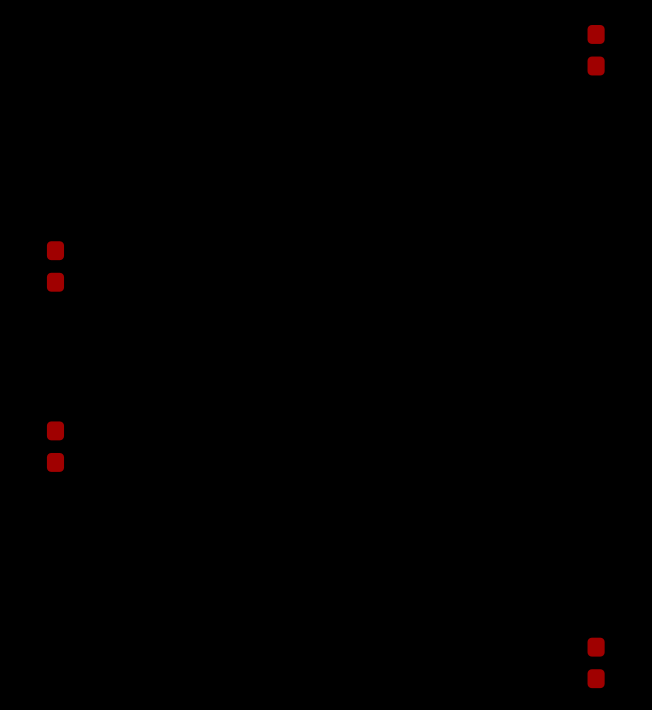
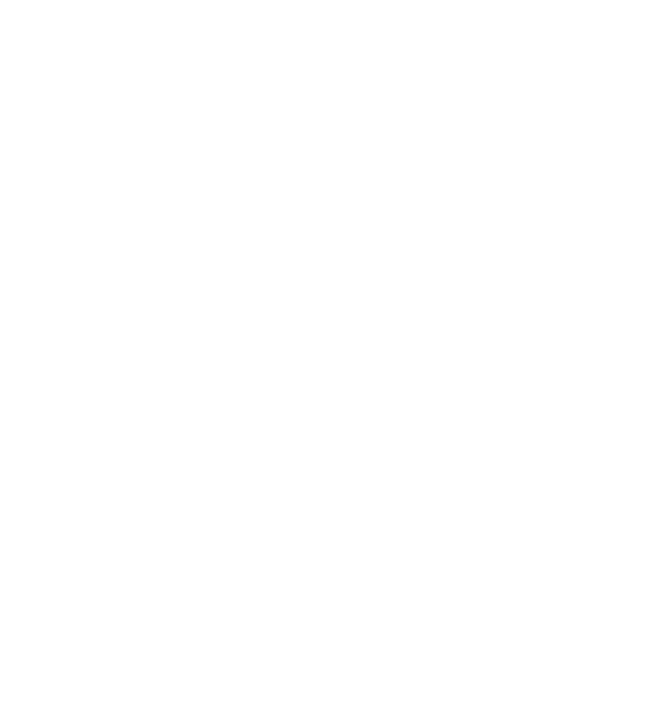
part: (596, 50) -> none
part: (55, 266) -> none
part: (55, 446) -> none
part: (596, 662) -> none

